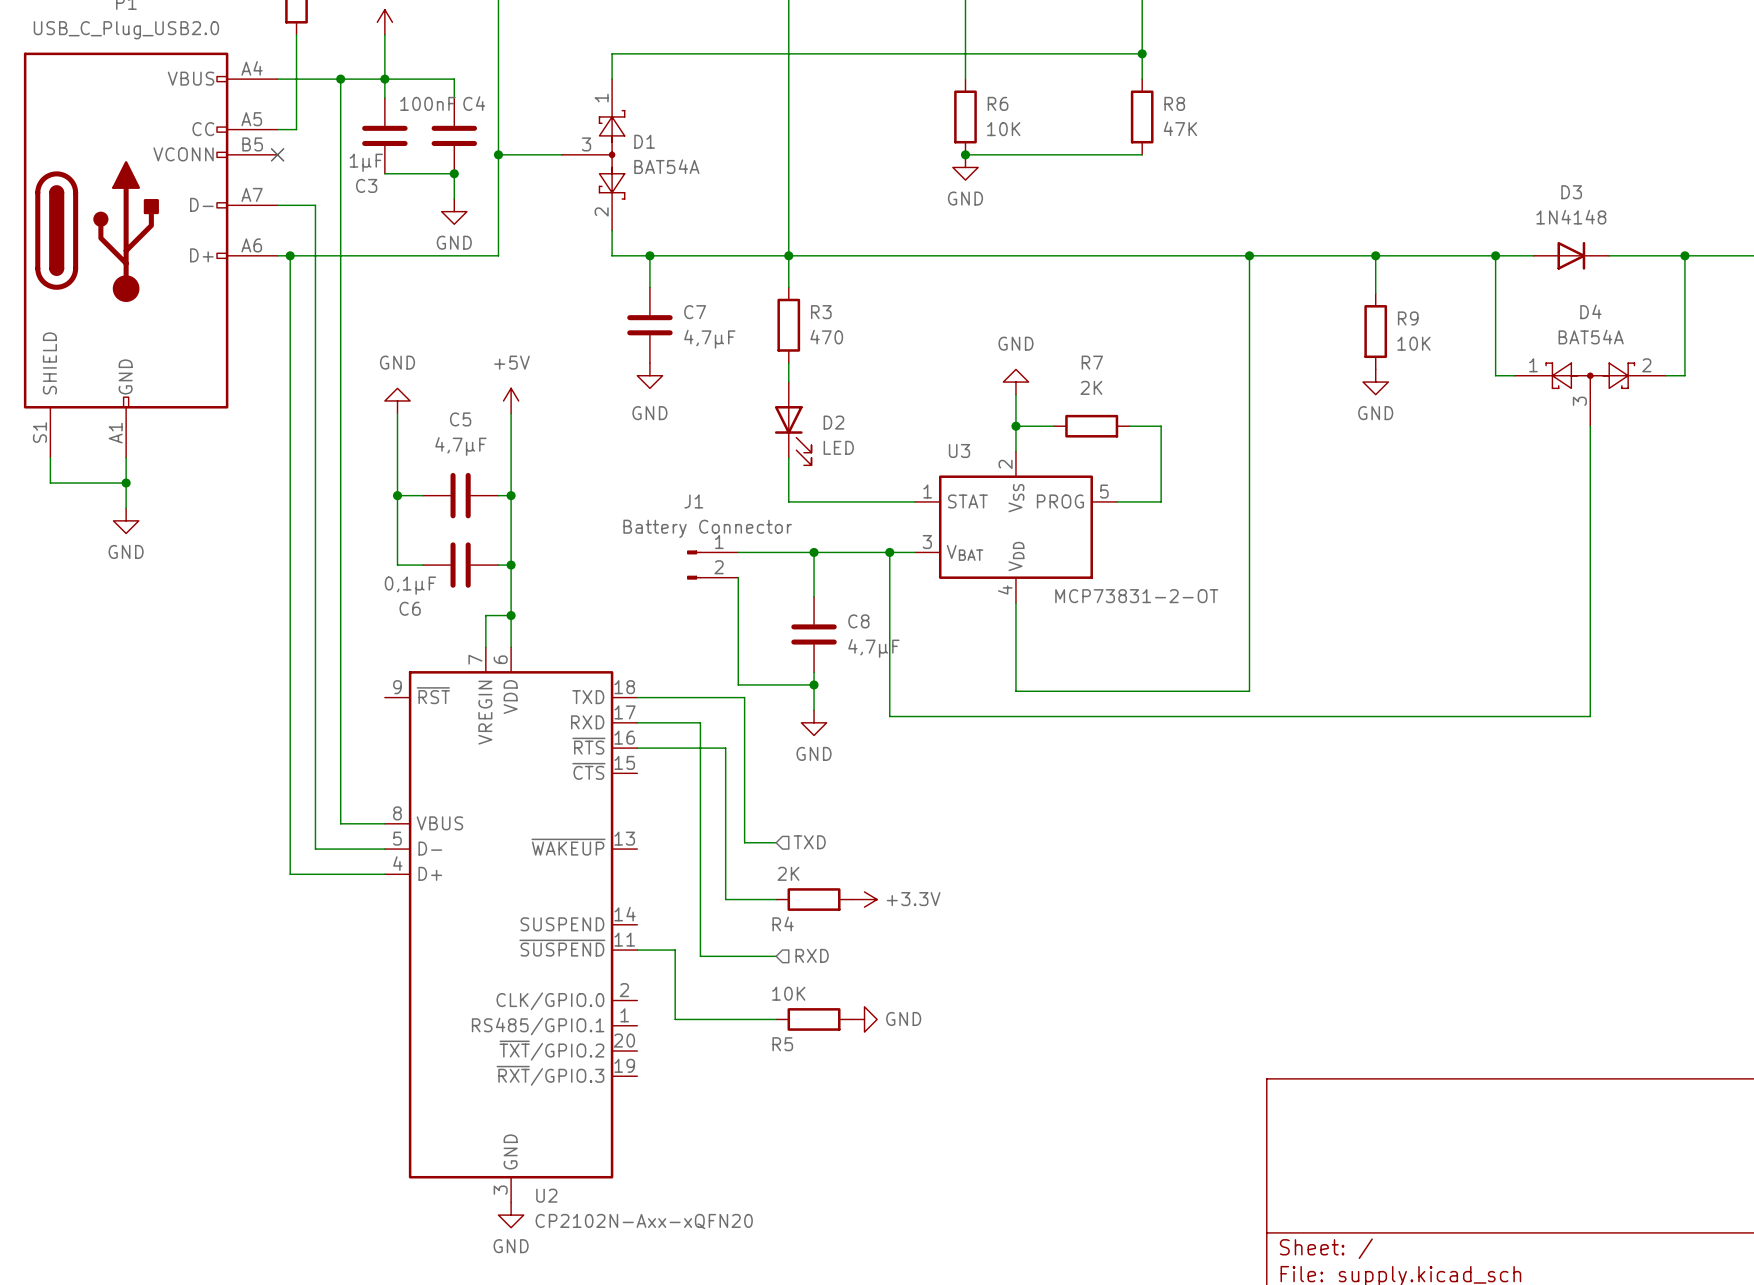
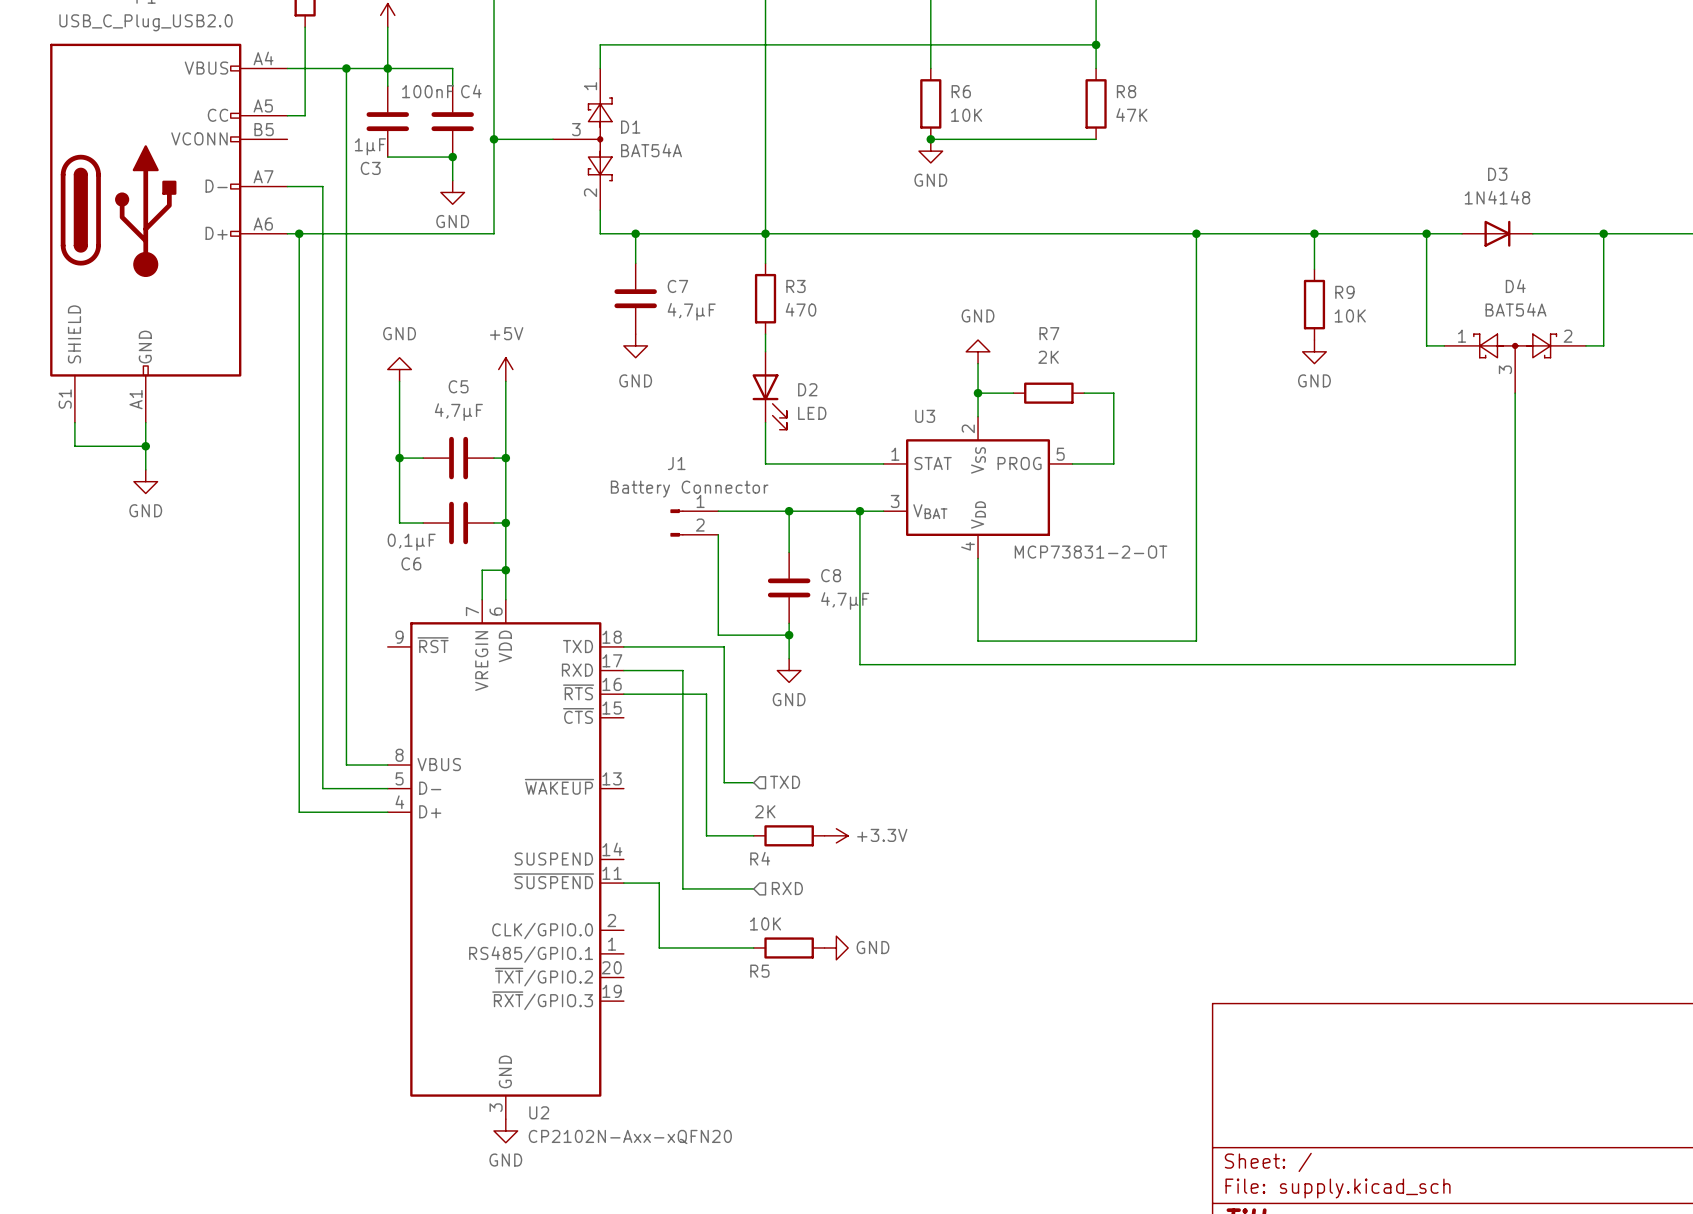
no-connect mark: (277, 154) -> none

